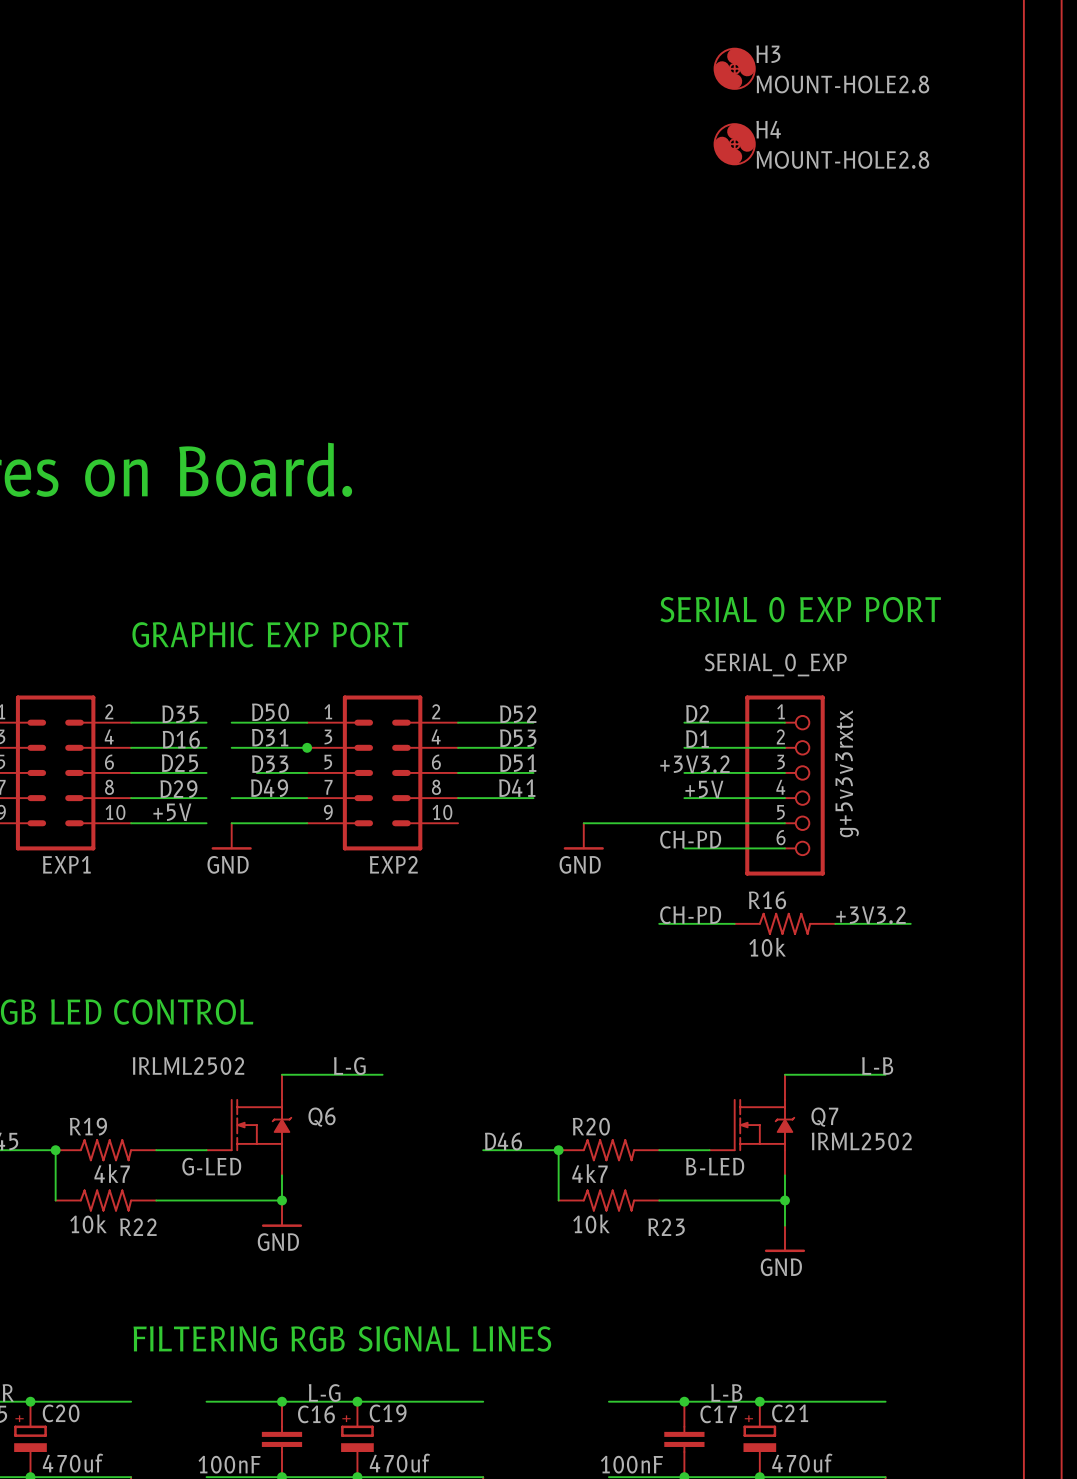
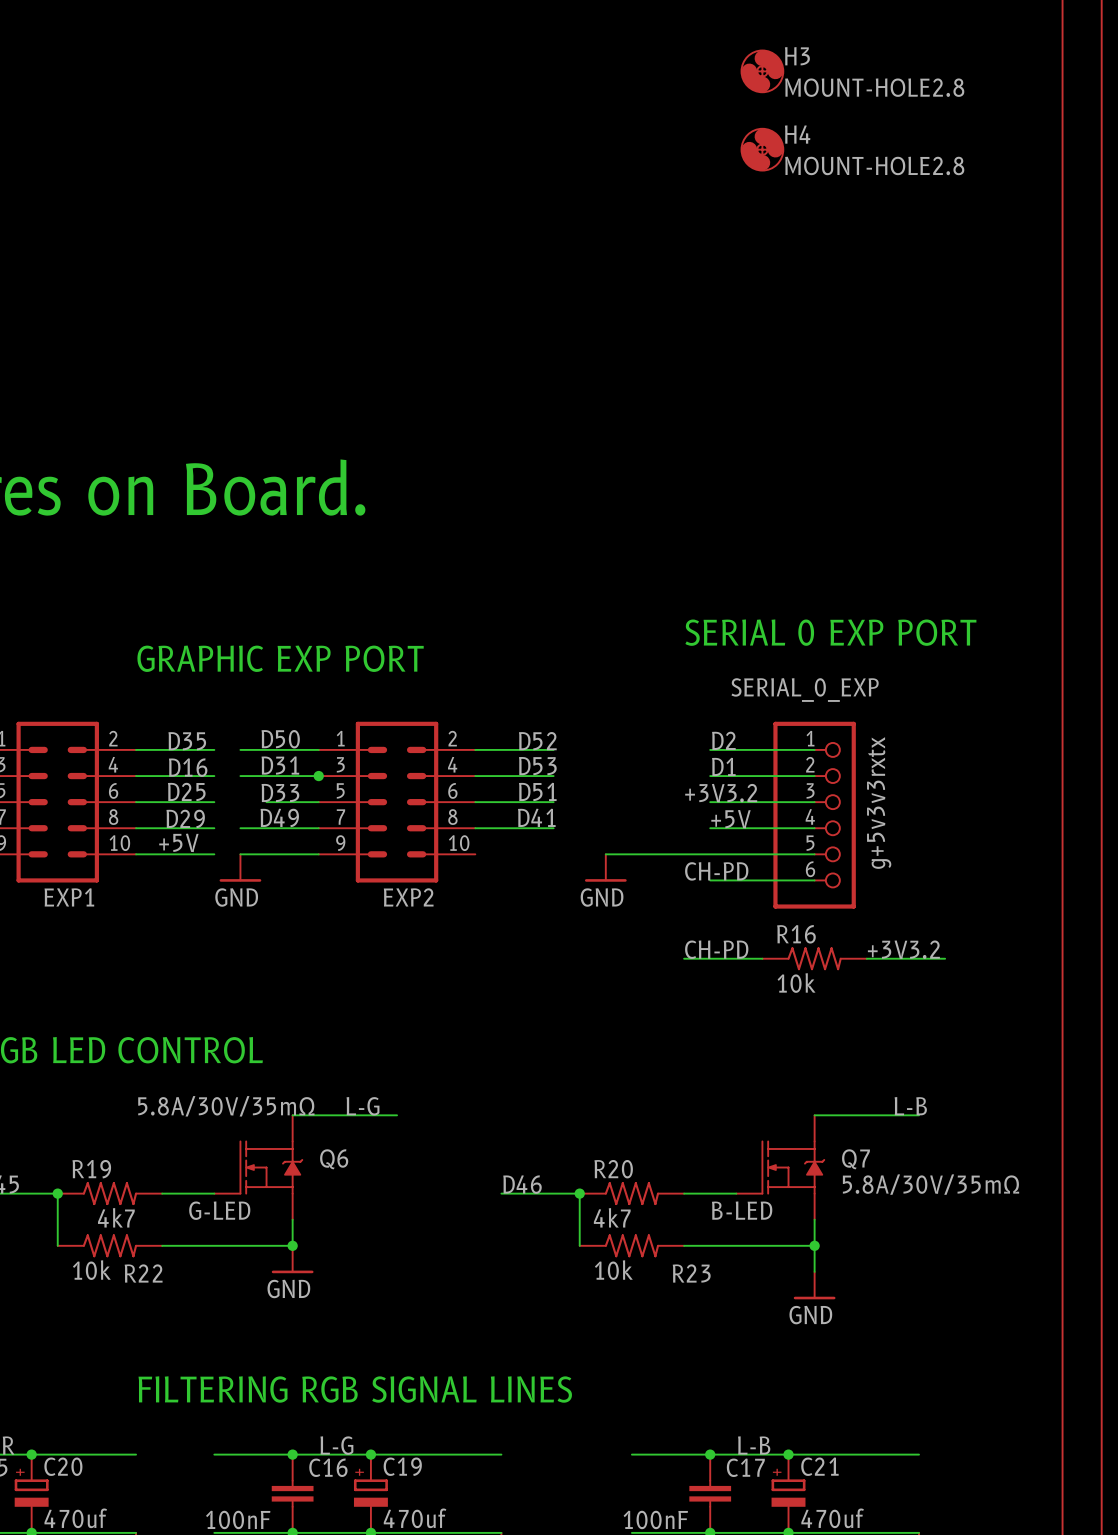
Q6 value: IRLML2502 (188, 1066) -> 5.8A/30V/35mΩ (226, 1106)
Q7 value: IRML2502 (861, 1141) -> 5.8A/30V/35mΩ (931, 1184)

